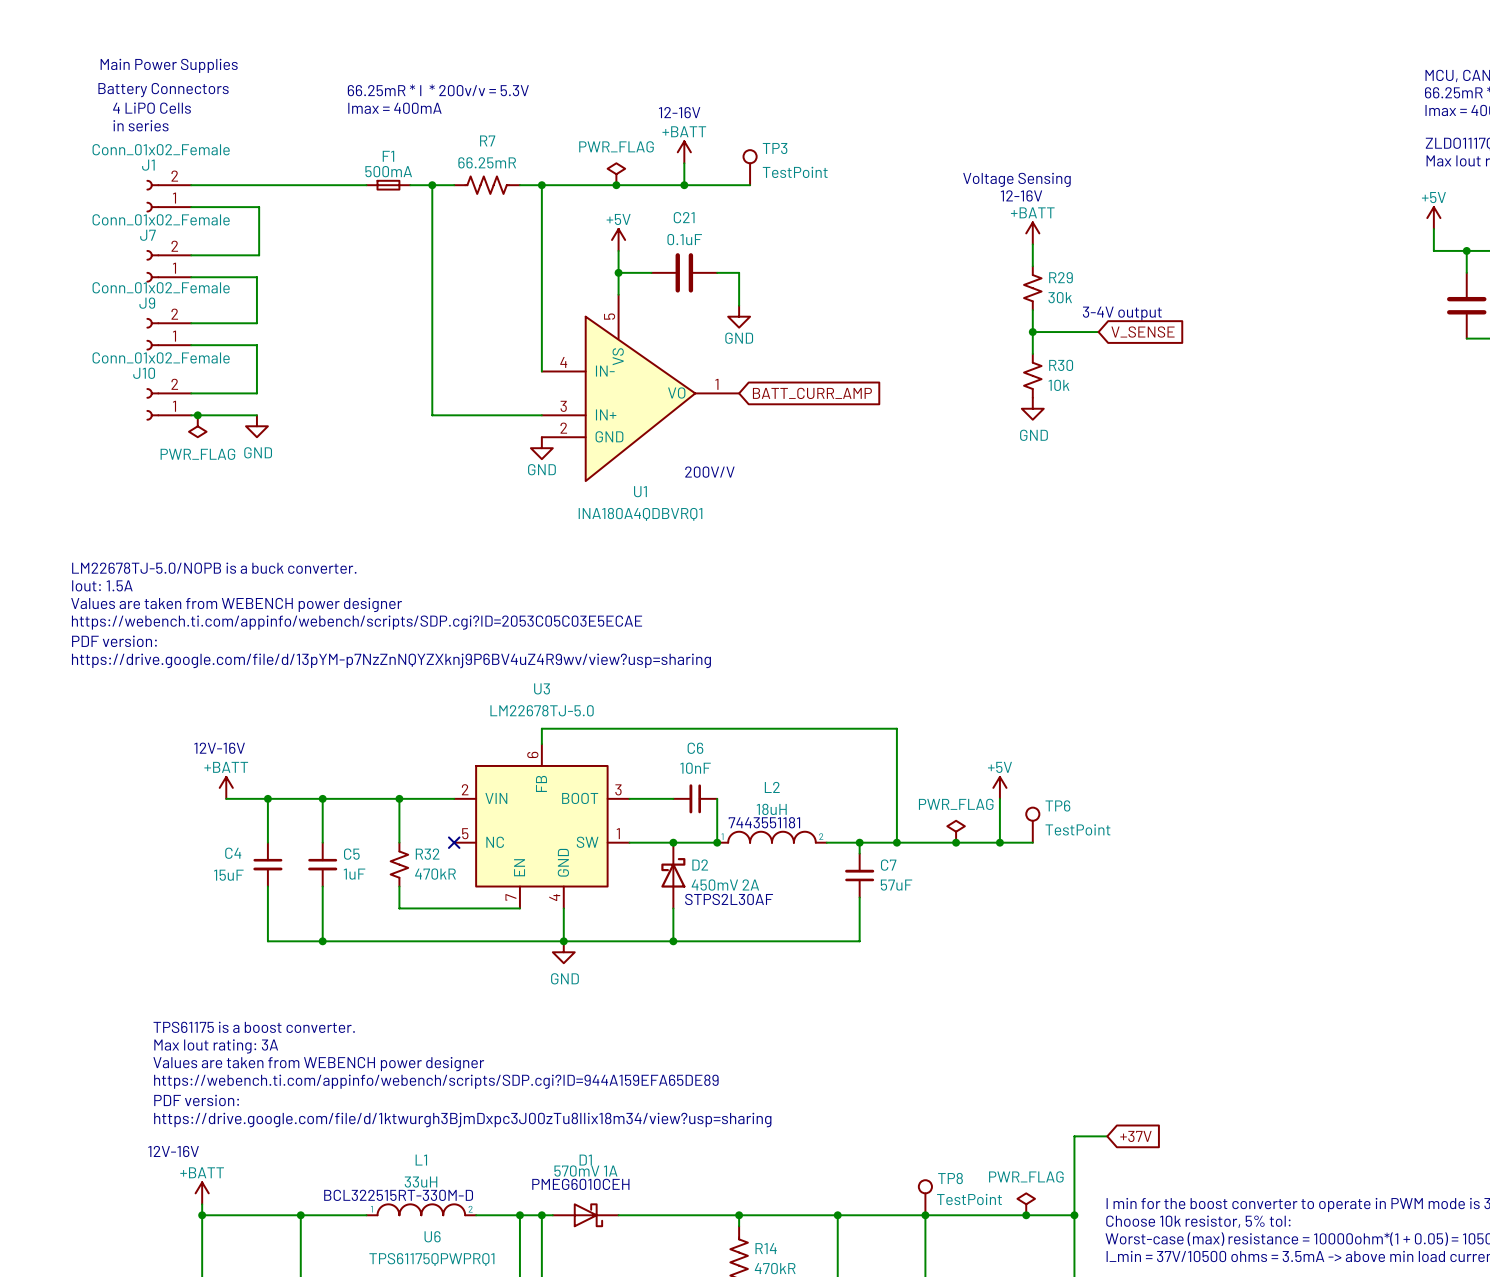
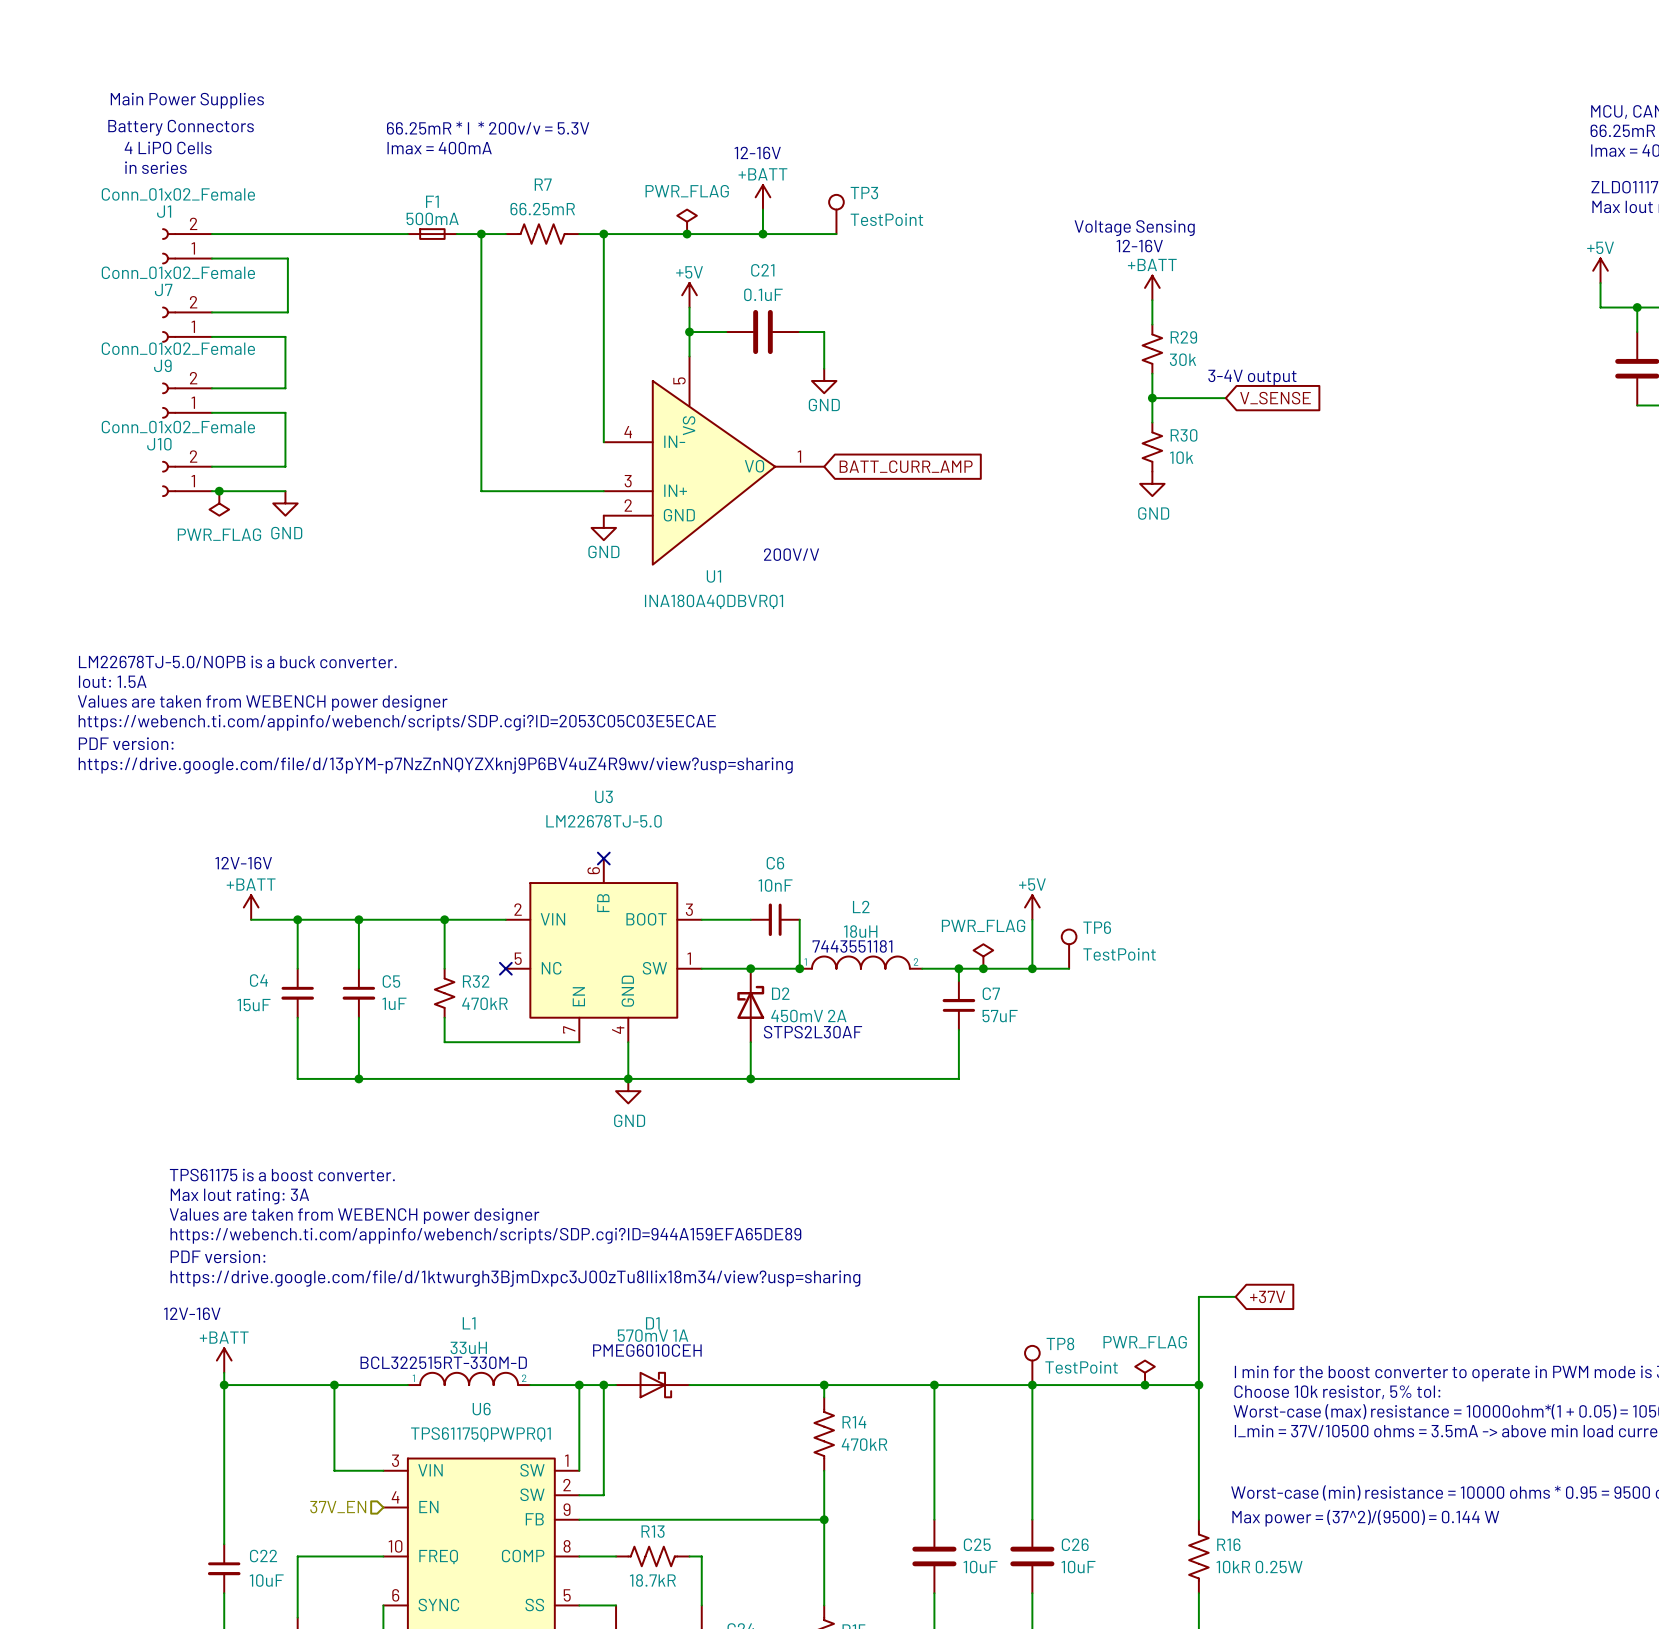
wire: (541, 744) (541, 728) (896, 728) (896, 842) -> none
no-connect mark: none -> (603, 858)
power symbol position: +5V (999, 787) -> +5V (1032, 907)
wire: (999, 798) (999, 842) -> (1032, 919) (1032, 968)
TP6 position: (1032, 825) -> (1069, 949)
power symbol position: PWR_FLAG (956, 831) -> PWR_FLAG (983, 956)
junction: none -> (983, 968)
junction: (896, 842) -> none
junction: none -> (1032, 968)
junction: (956, 842) -> none
wire: (958, 842) (1032, 842) -> none
junction: (999, 842) -> none

